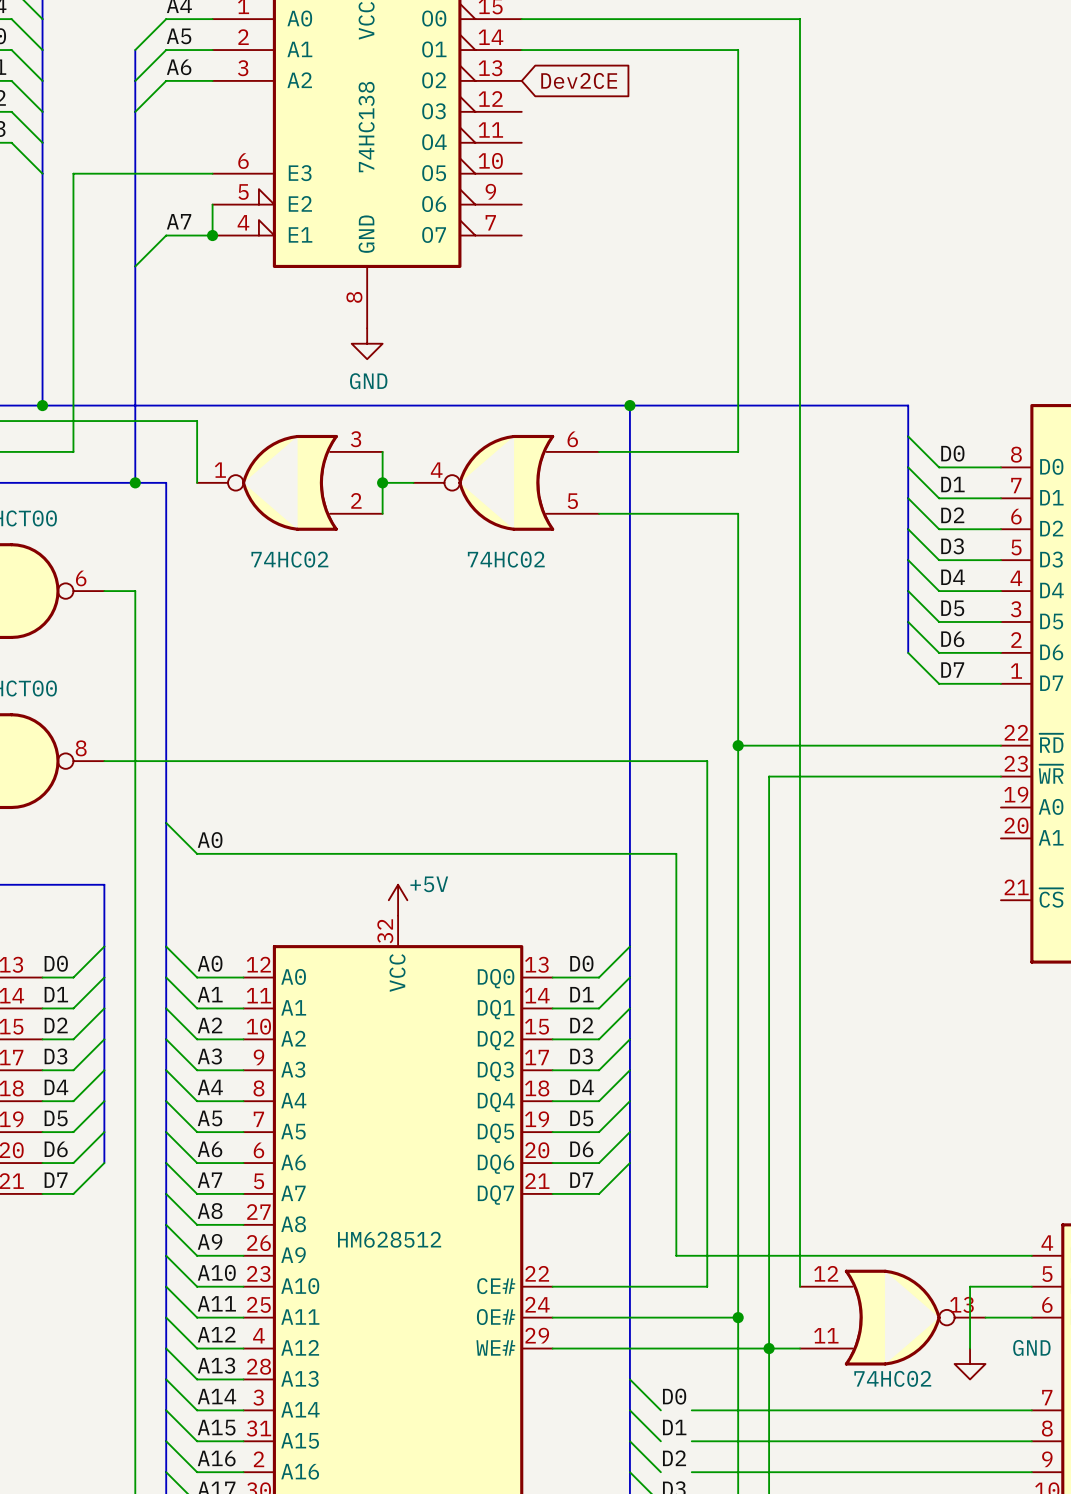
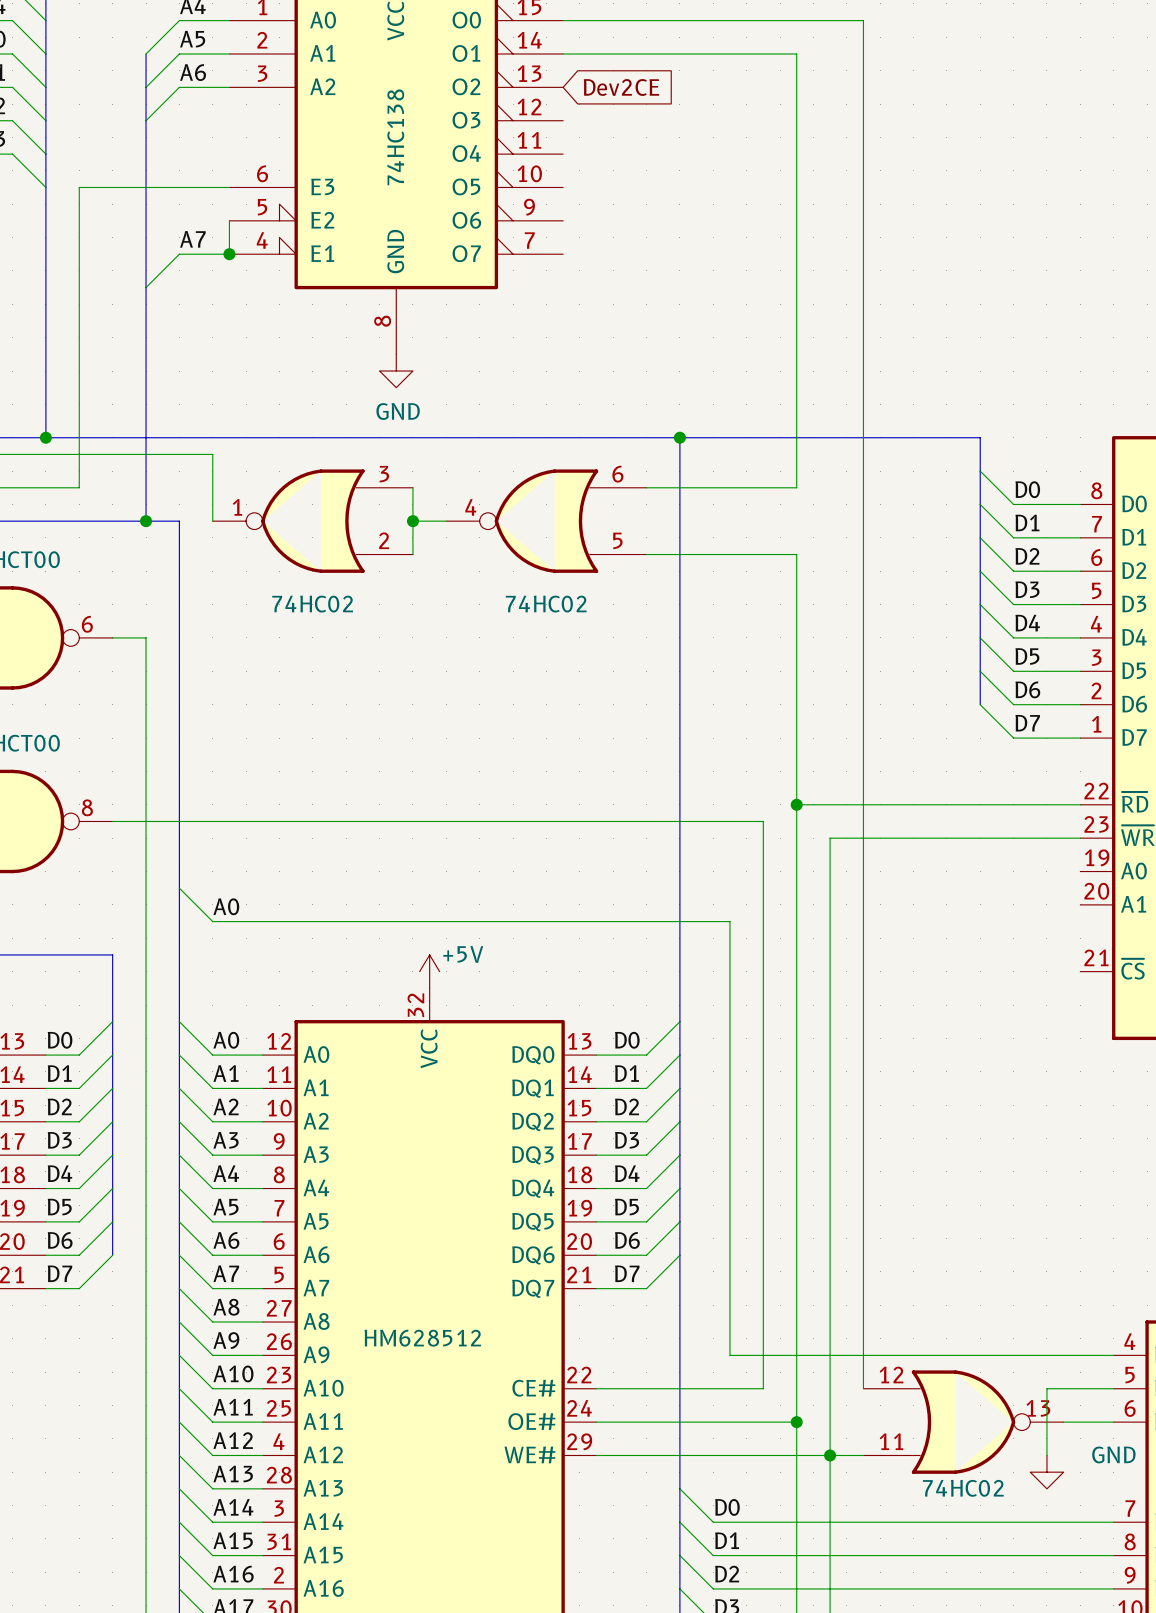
wire: none -> (713, 1522) (746, 1522)
wire: none -> (713, 1555) (746, 1555)
wire: none -> (713, 1588) (746, 1588)

